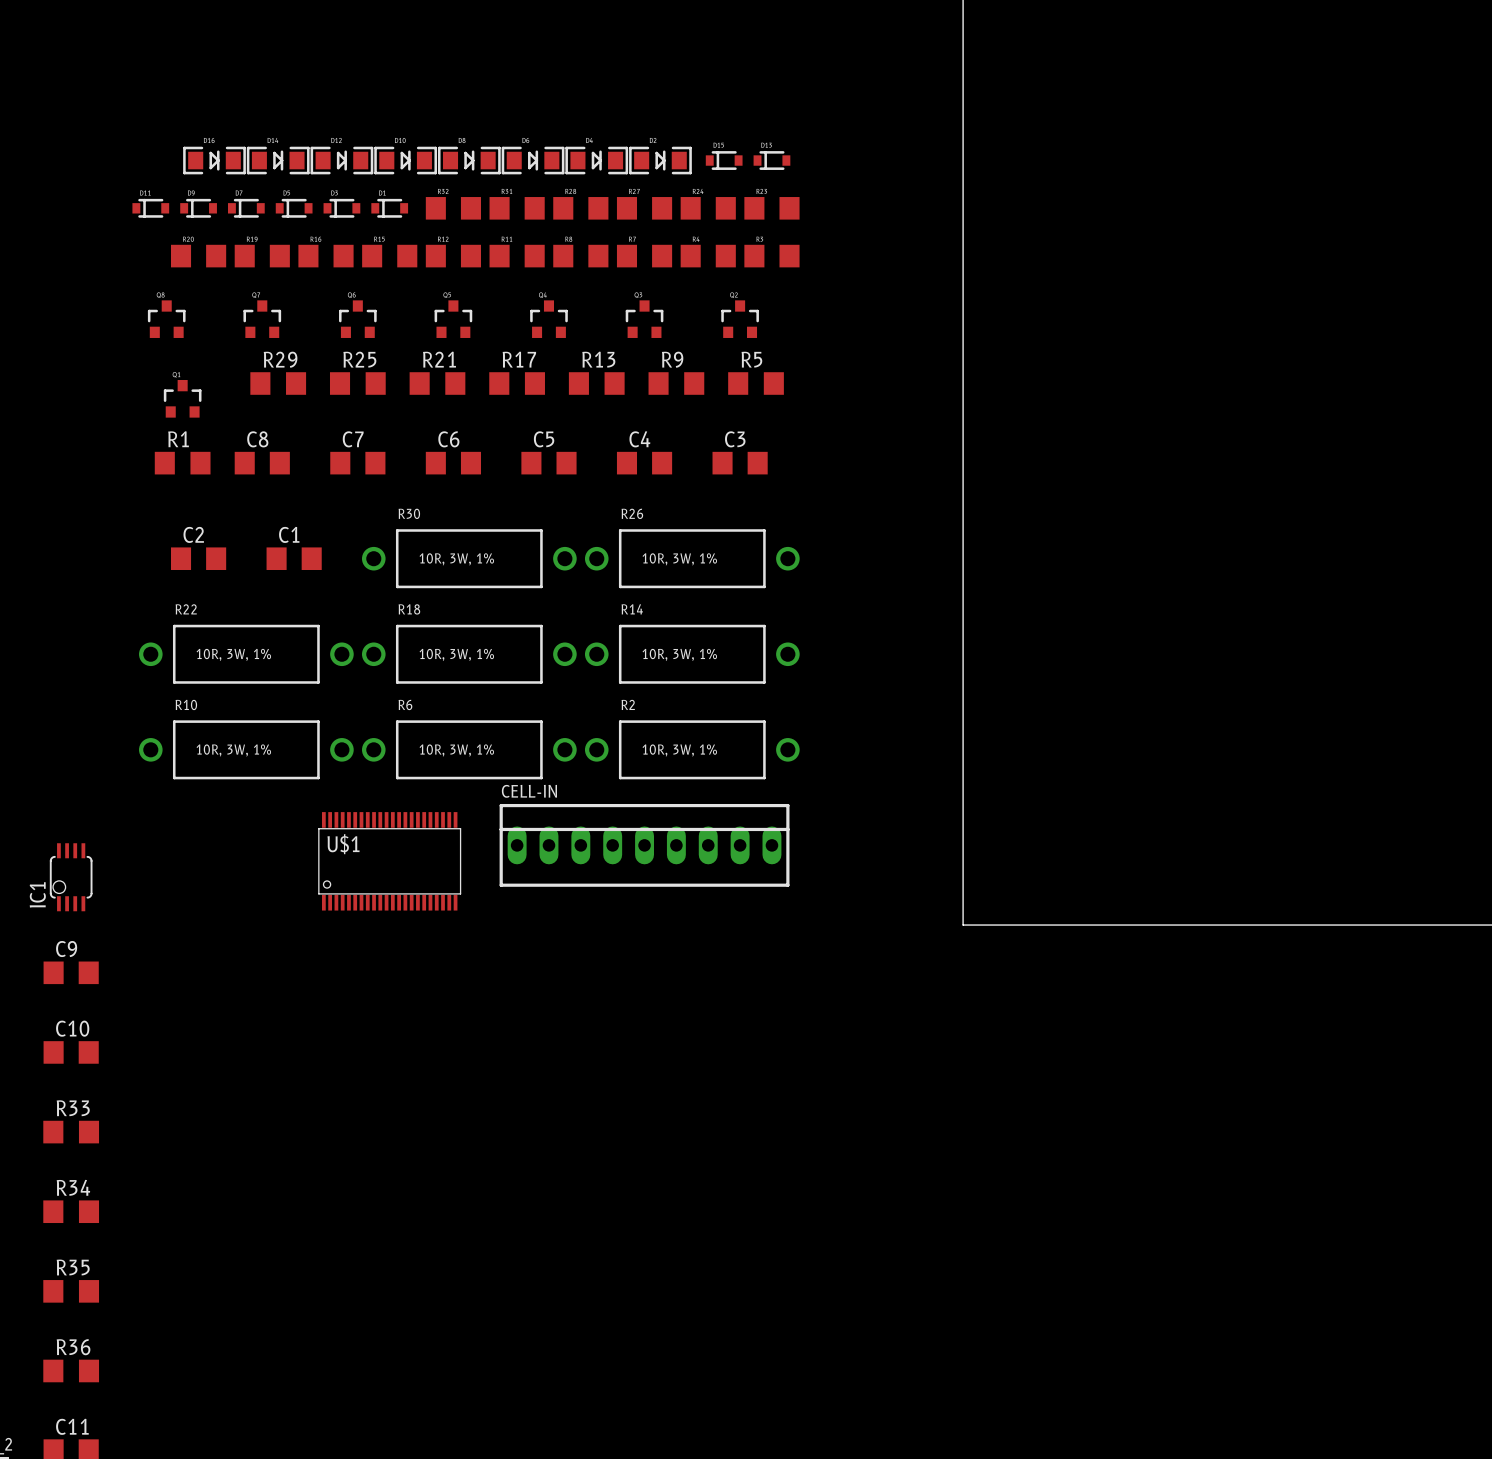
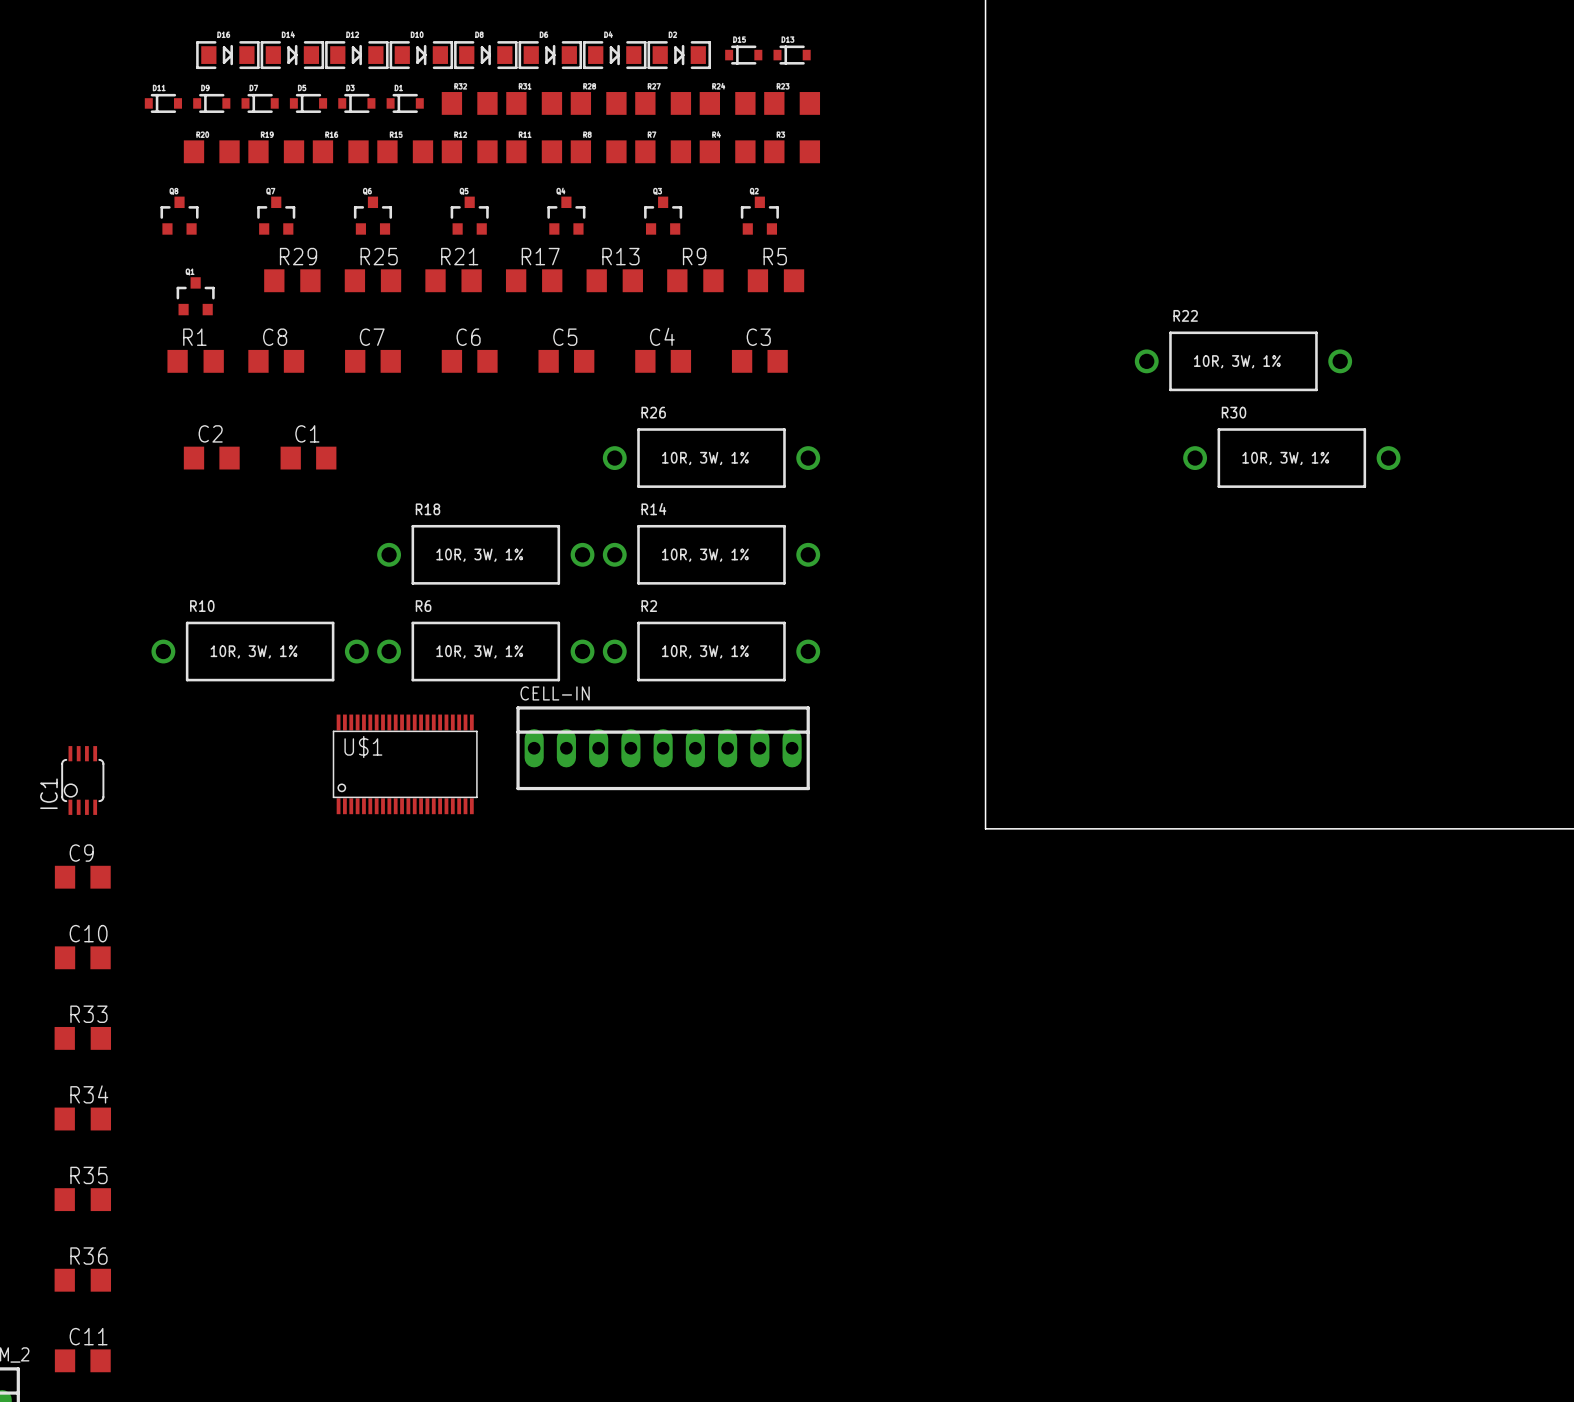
R30 position: (469, 558) -> (1291, 458)
R22 position: (246, 654) -> (1243, 361)

